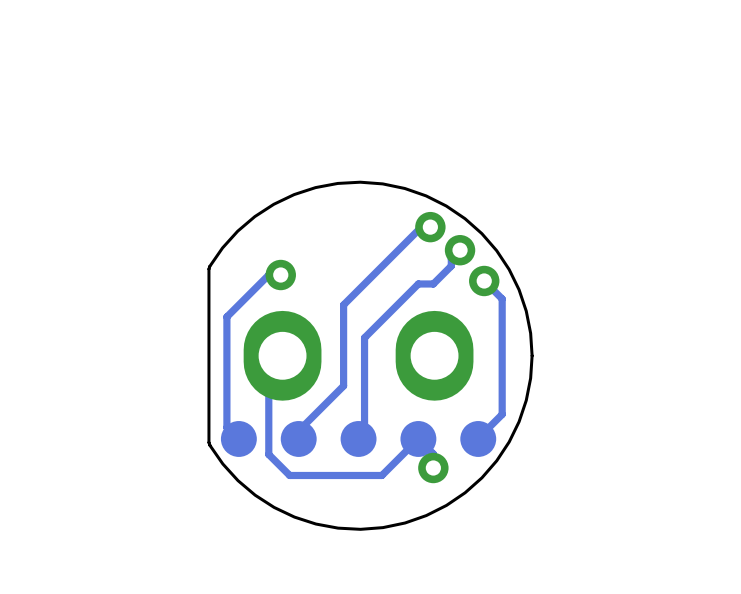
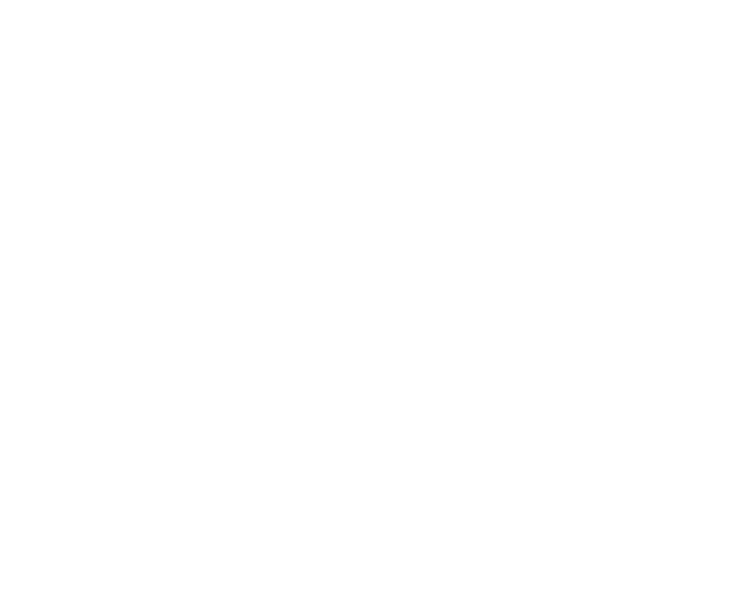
track: (430, 227) (421, 227) (343, 304) (343, 385) (298, 430) (298, 438) -> none
via: (430, 227) -> none
track: (460, 250) (451, 258) (451, 266) (433, 283) (418, 283) (364, 337) (364, 432) (358, 438) -> none
via: (460, 250) -> none
board edge: (209, 266) (208, 442) (222, 463) (238, 480) (274, 507) (294, 517) (338, 528) (383, 527) (405, 522) (446, 505) (465, 492) (481, 477) (509, 441) (519, 421) (530, 378) (530, 333) (526, 311) (509, 269) (496, 250) (465, 218) (446, 206) (426, 195) (382, 183) (337, 183) (315, 187) (273, 204) (254, 216) (222, 247) (209, 266) -> none
track: (280, 275) (268, 275) (226, 316) (226, 427) (238, 438) -> none
via: (280, 275) -> none
track: (484, 280) (502, 298) (502, 414) (477, 438) -> none
via: (484, 280) -> none
track: (282, 355) (268, 369) (268, 454) (289, 475) (381, 475) (418, 438) (433, 453) (433, 468) -> none
part: (282, 355) -> none
part: (434, 355) -> none
part: (358, 438) -> none
via: (433, 468) -> none

